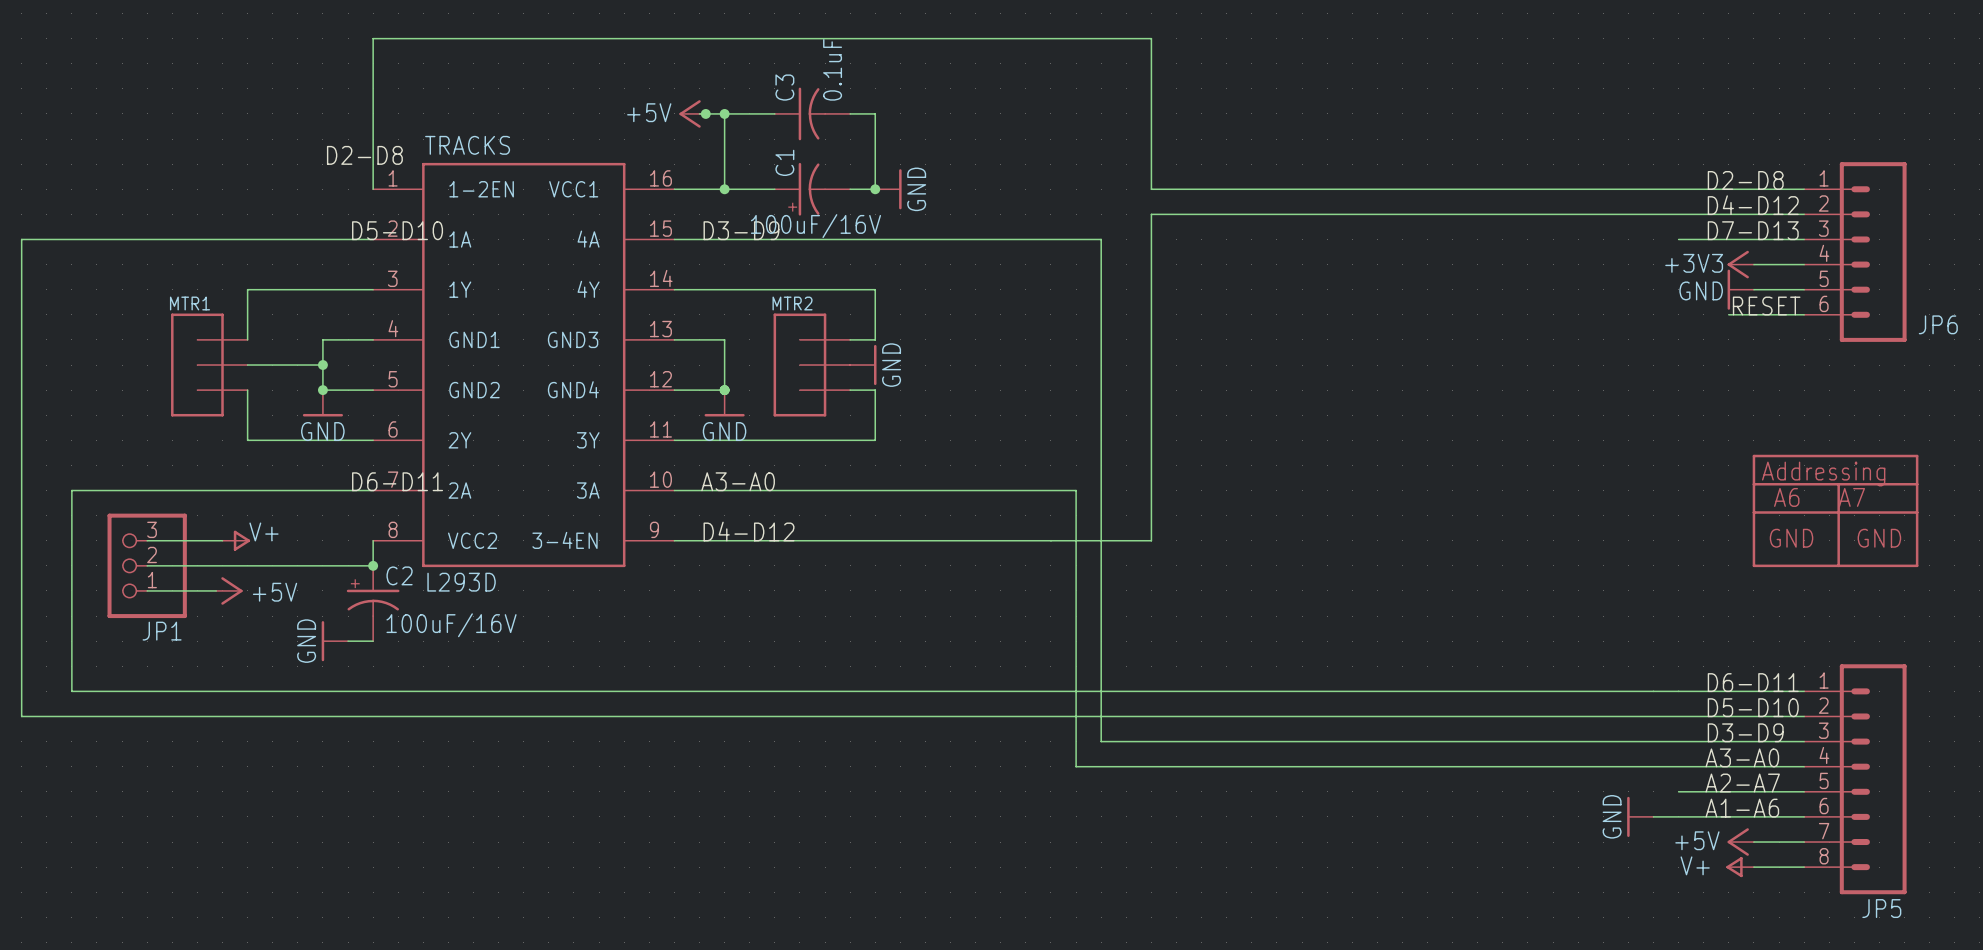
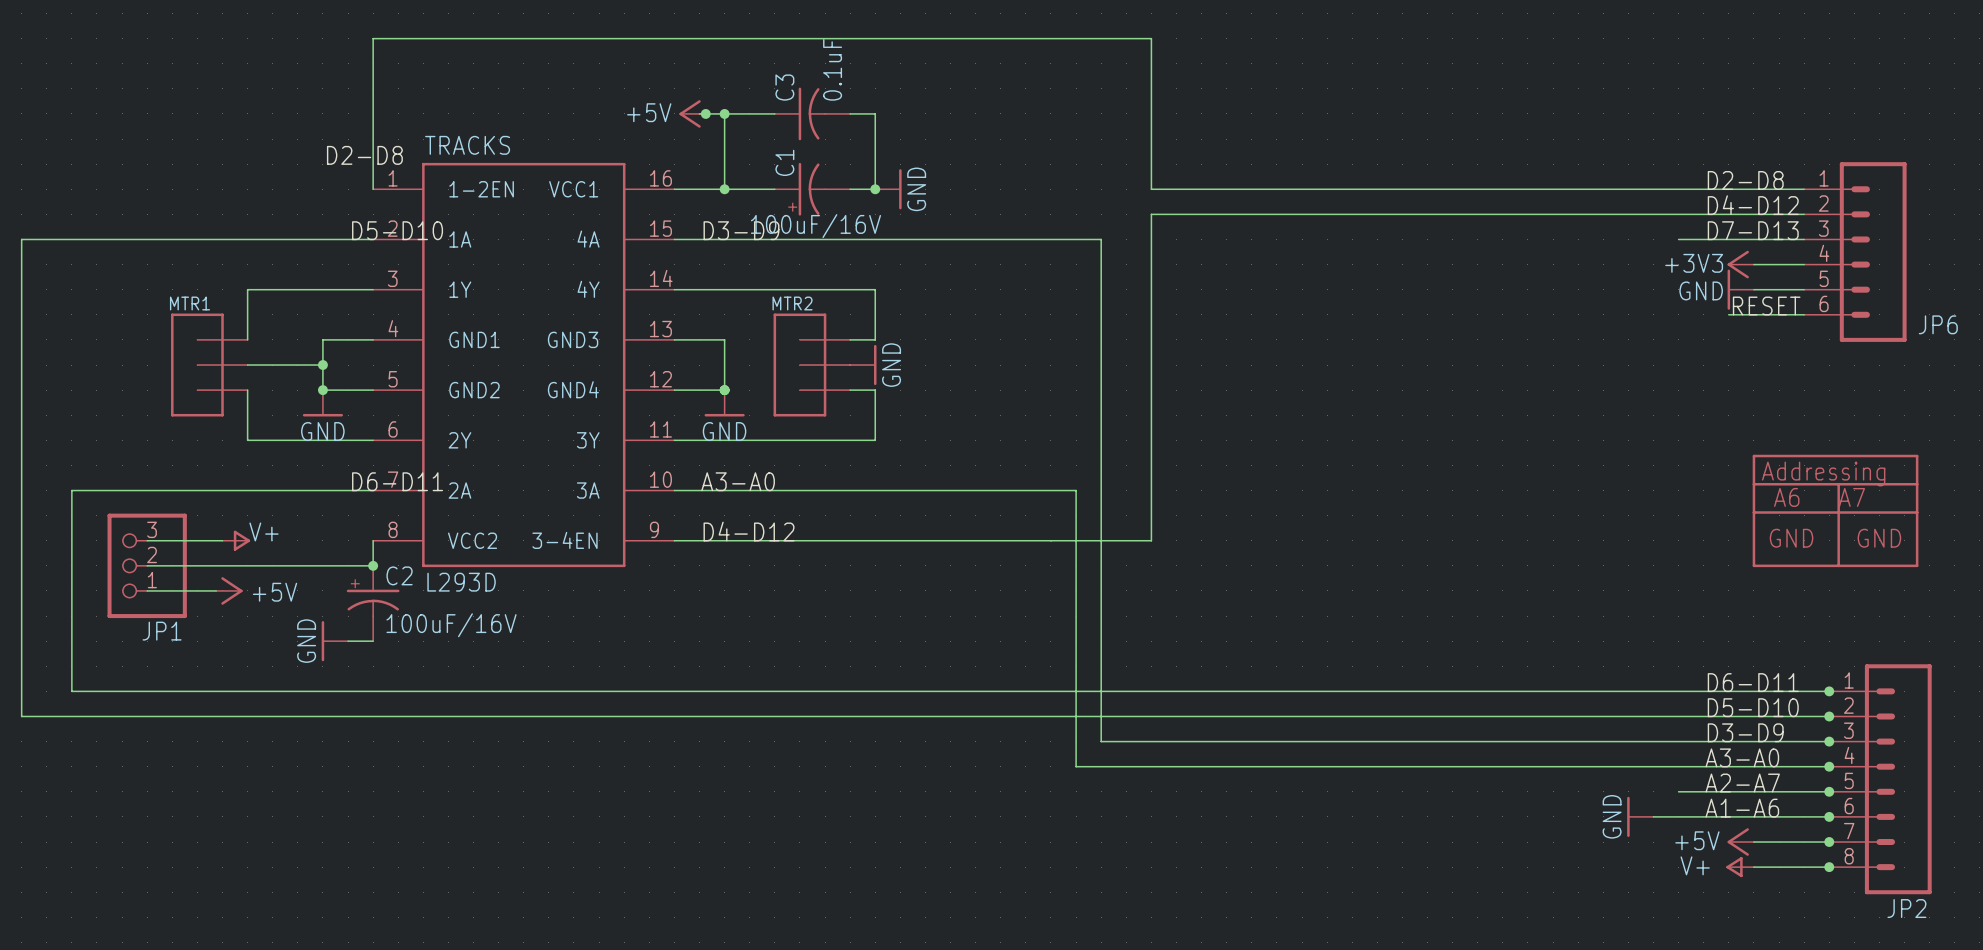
junction: none -> (1829, 691)
junction: none -> (1829, 716)
junction: none -> (1829, 741)
junction: none -> (1829, 766)
JP5: (1855, 779) -> none
JP2: none -> (1880, 779)
junction: none -> (1829, 791)
junction: none -> (1829, 816)
junction: none -> (1829, 842)
junction: none -> (1829, 867)

